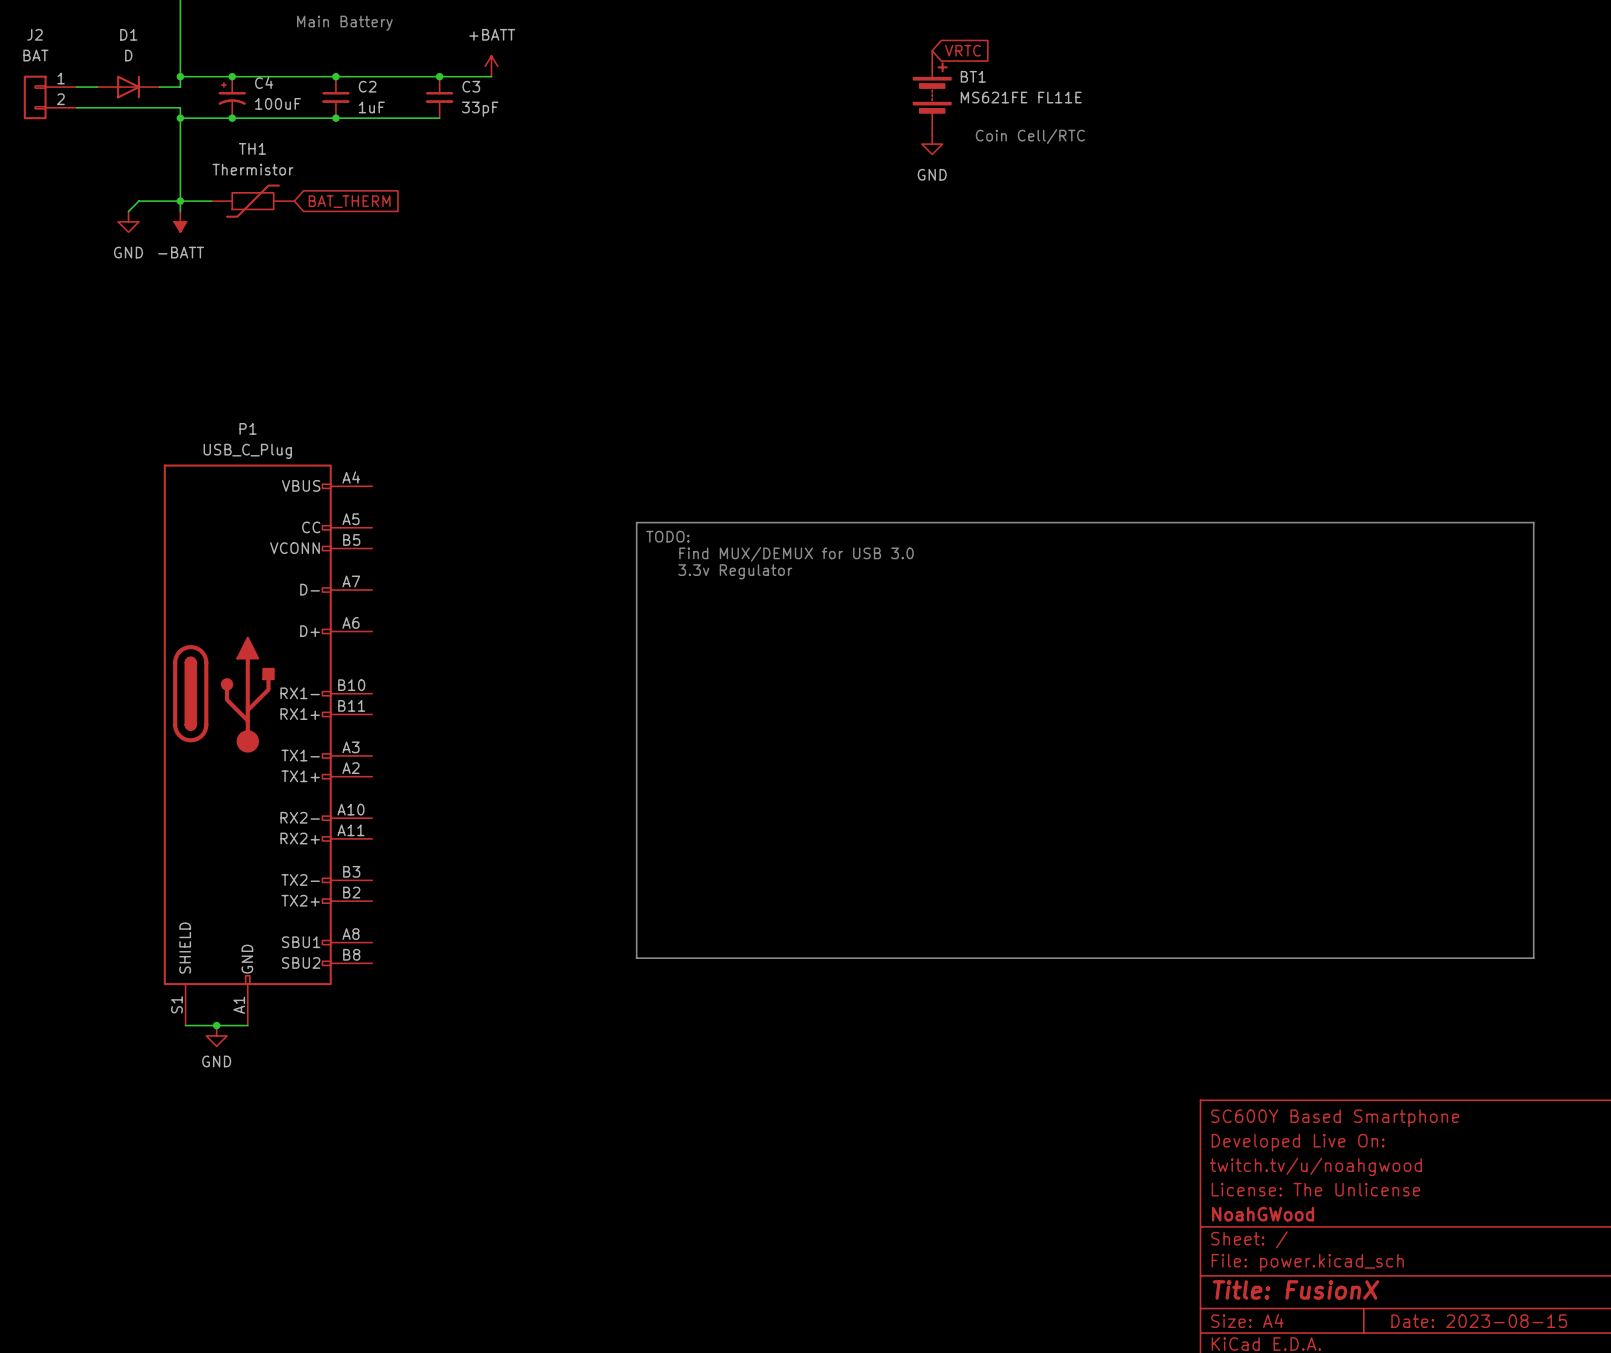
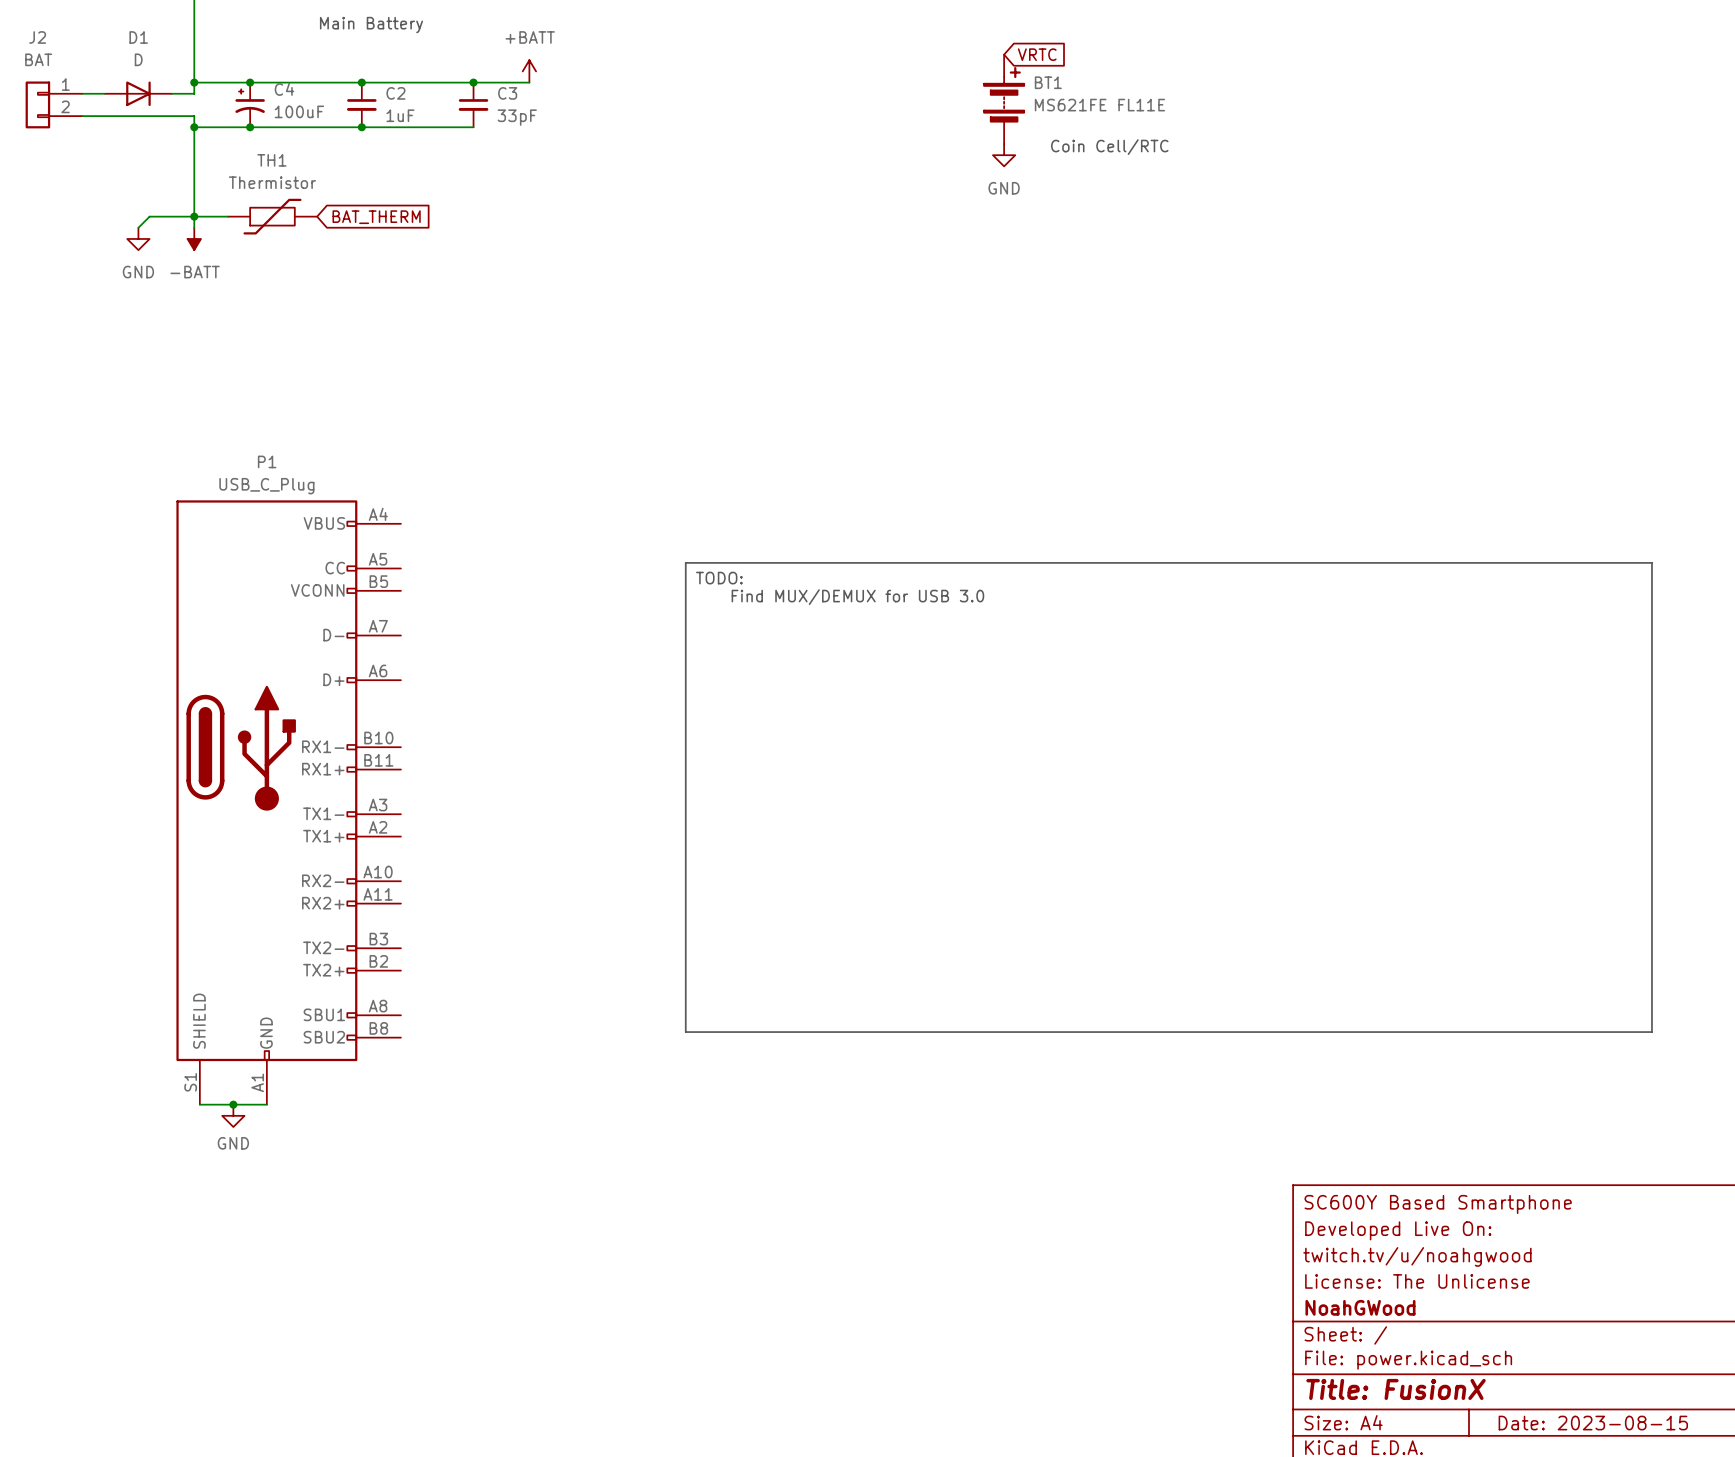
text: 3.3v Regulator (735, 571) -> none

